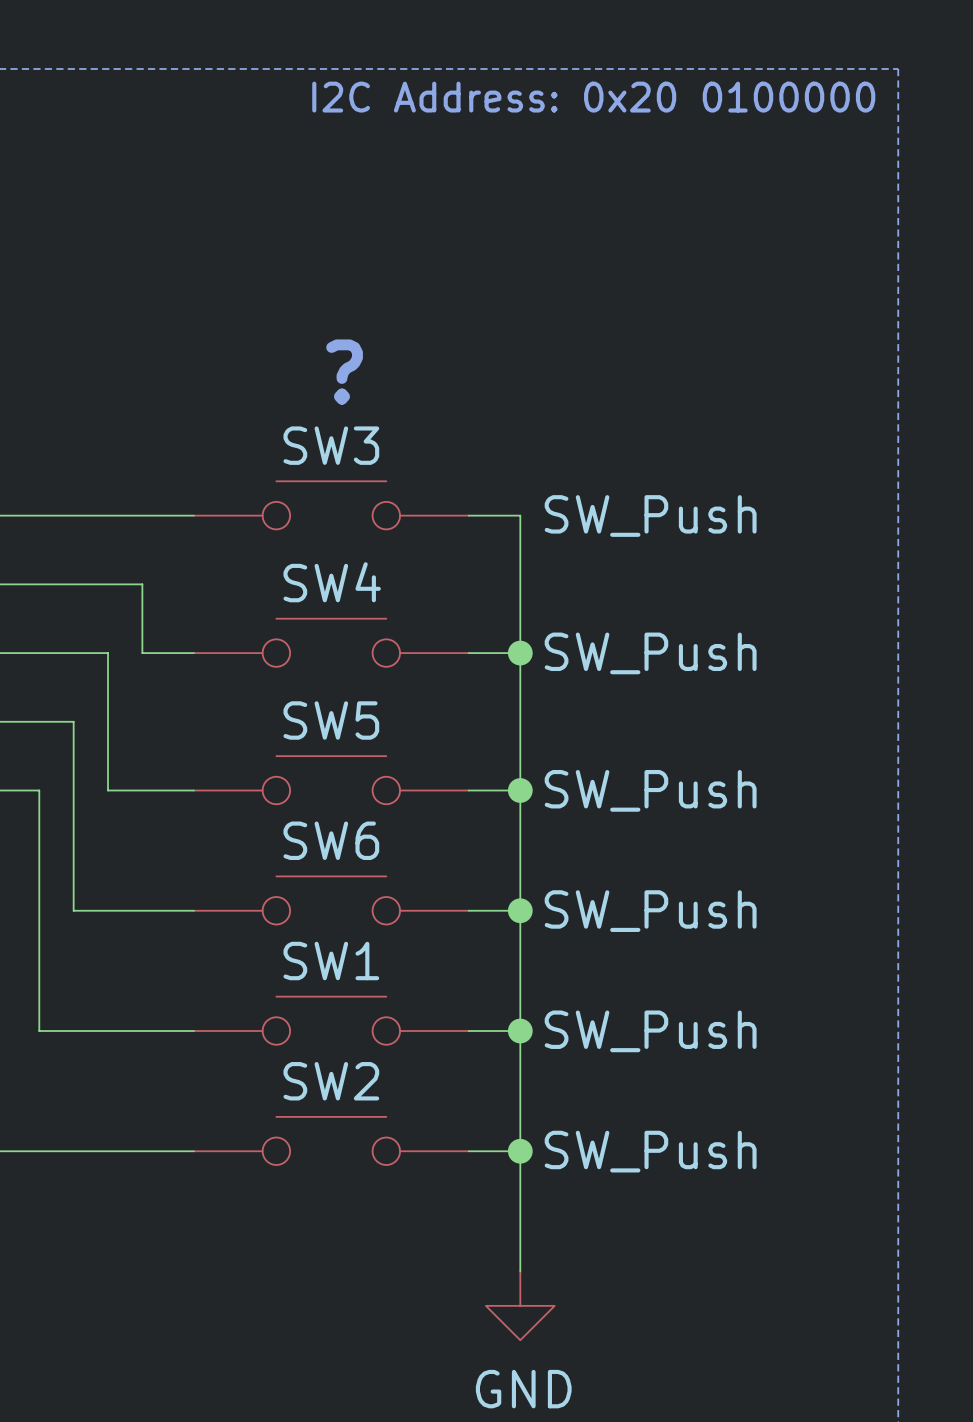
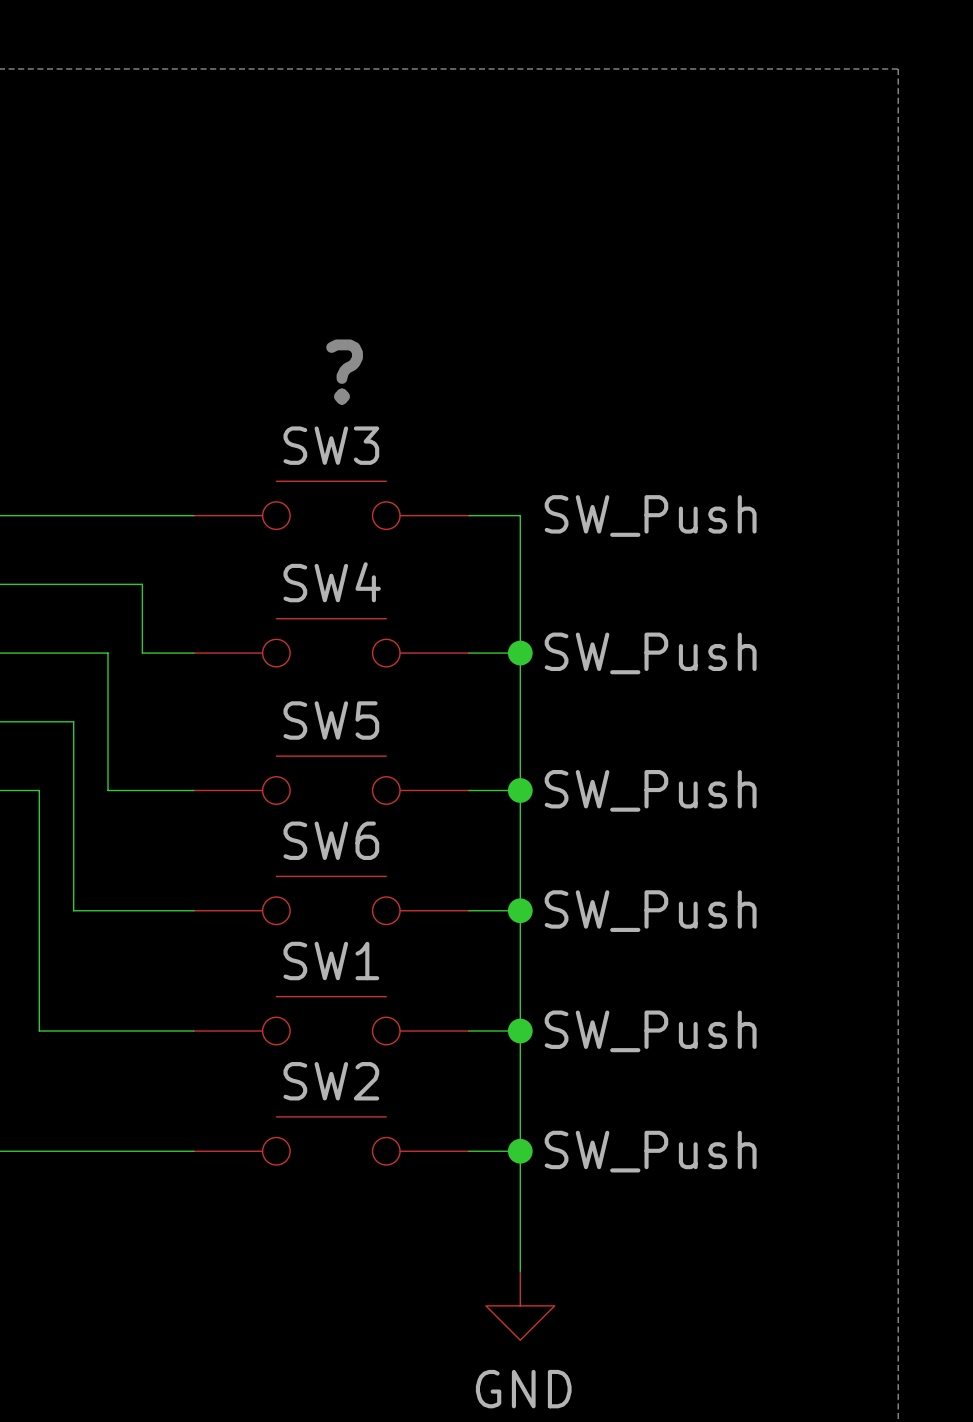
text: I2C Address: 0x20 0100000 (593, 97) -> none

